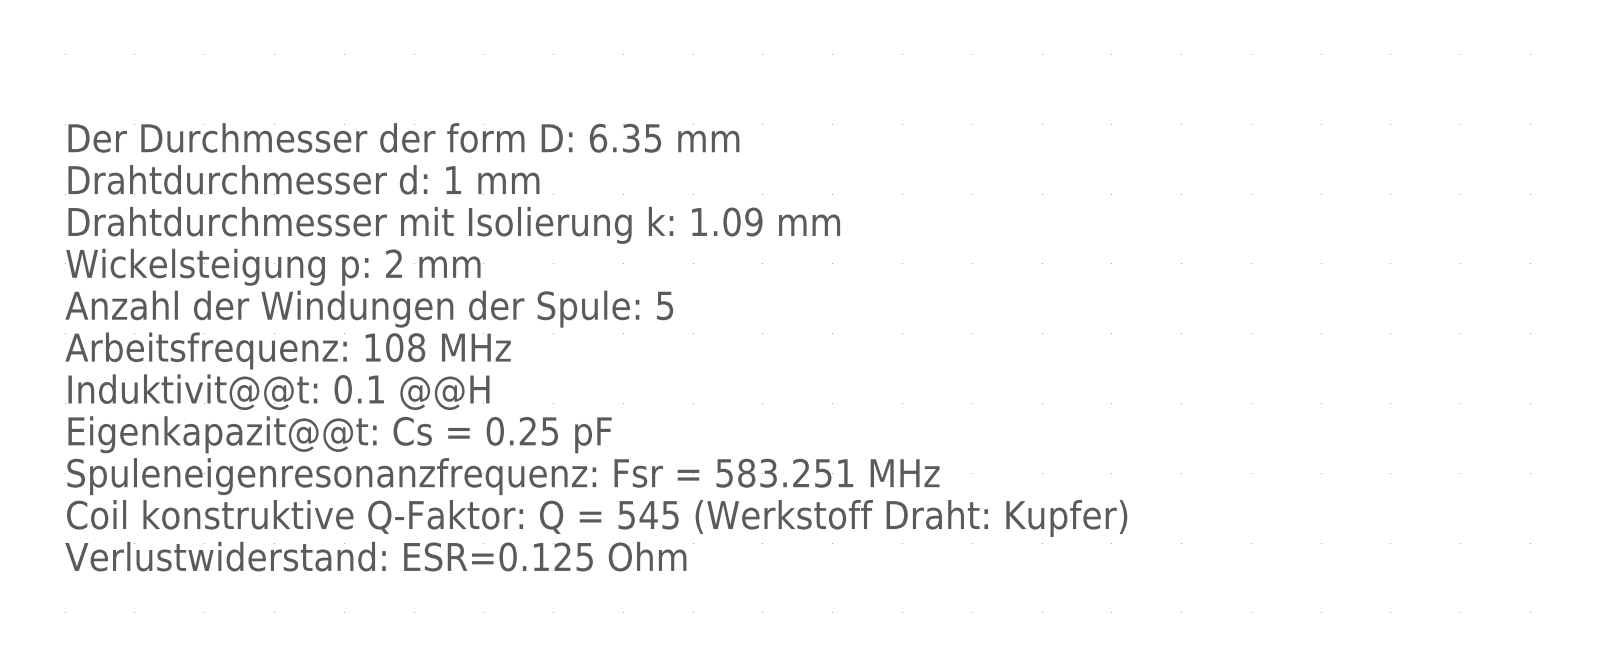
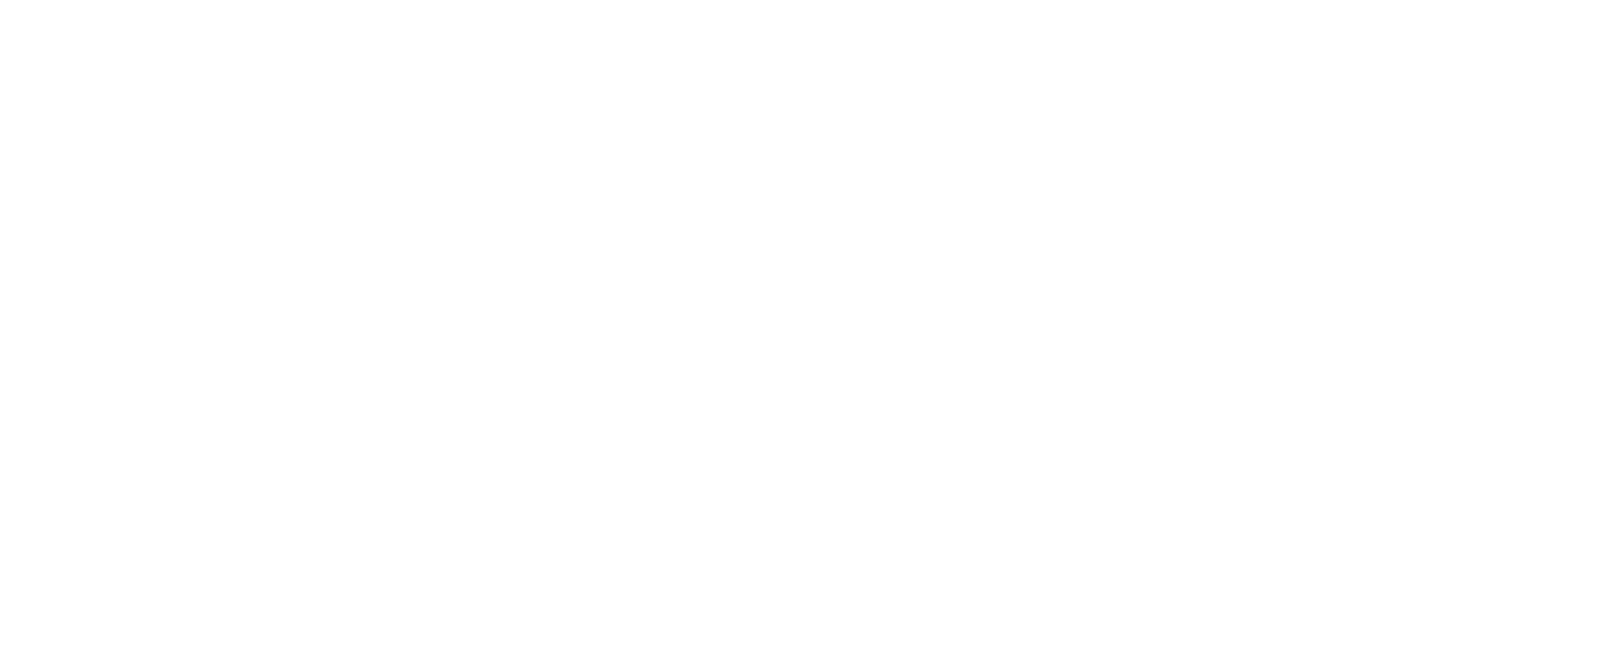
text: Der Durchmesser der form D: 6.35 mm (403, 137) -> none
text: Drahtdurchmesser d: 1 mm (303, 179) -> none
text: Drahtdurchmesser mit Isolierung k: 1.09 mm (454, 225) -> none
text: Wickelsteigung p: 2 mm (273, 267) -> none
text: Anzahl der Windungen der Spule: 5 (369, 309) -> none
text: Arbeitsfrequenz: 108 MHz (288, 351) -> none
text: Induktivit@@t: 0.1 @@H (278, 392) -> none
text: Eigenkapazit@@t: Cs = 0.25 pF (340, 434) -> none
text: Spuleneigenresonanzfrequenz: Fsr = 583.251 MHz (503, 476) -> none
text: Coil konstruktive Q-Faktor: Q = 545 (Werkstoff Draht: Kupfer) (597, 518) -> none
text: Verlustwiderstand: ESR=0.125 Ohm (375, 556) -> none

